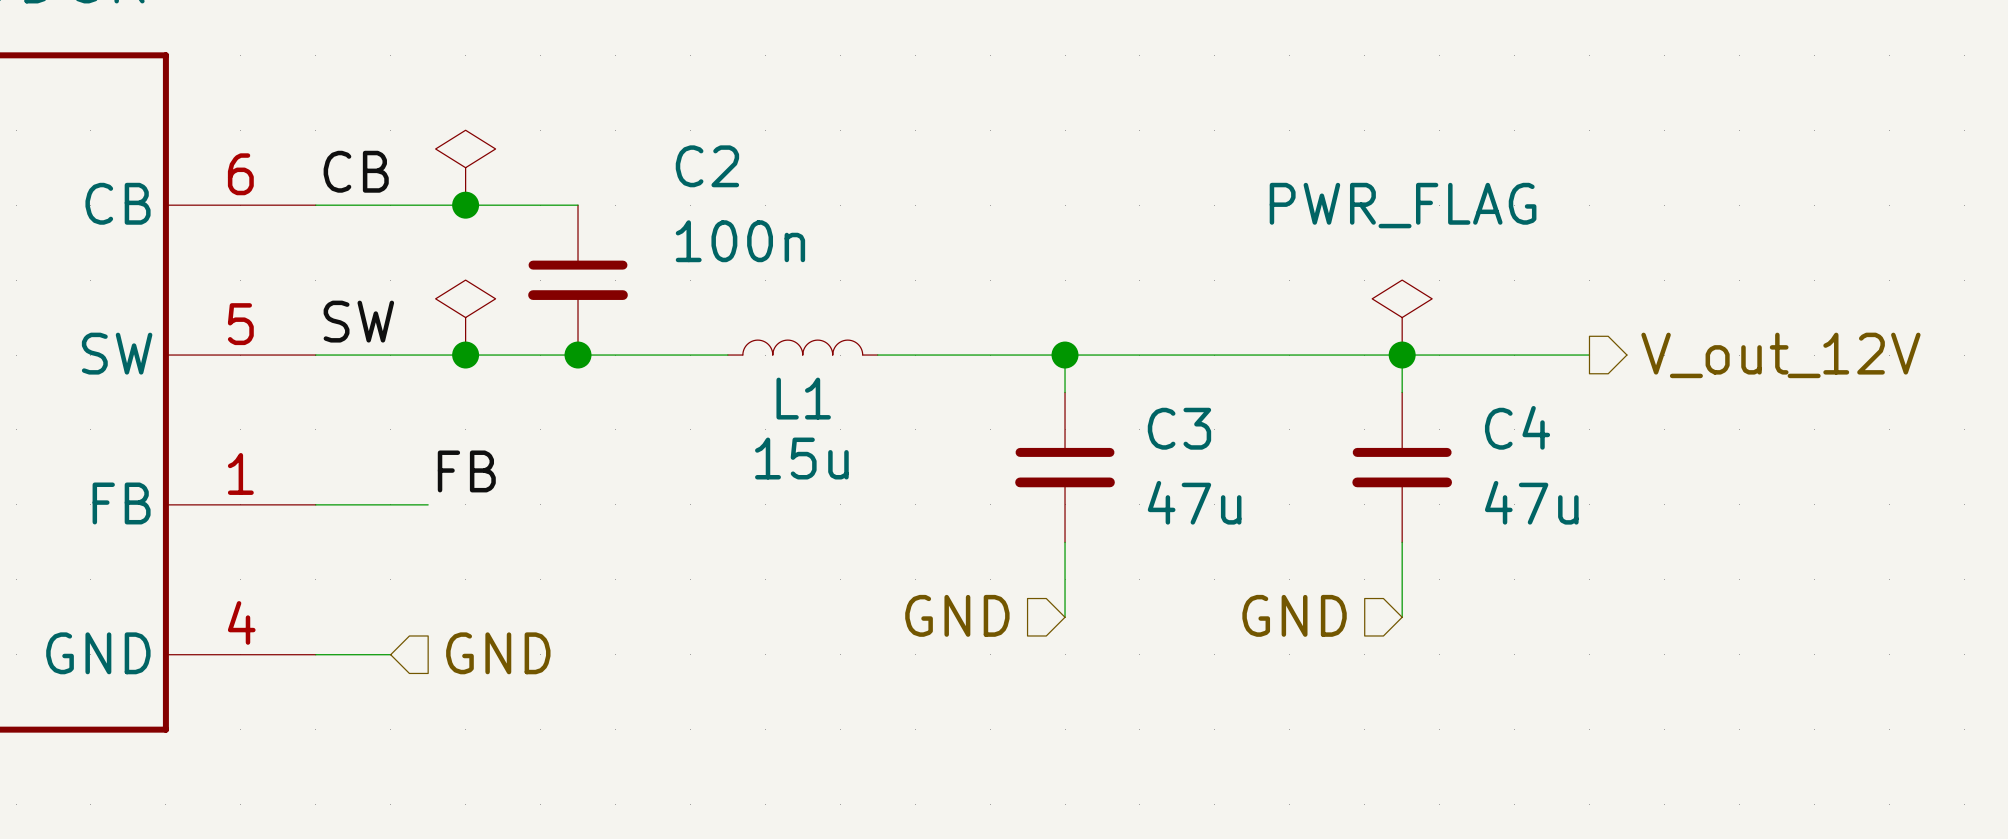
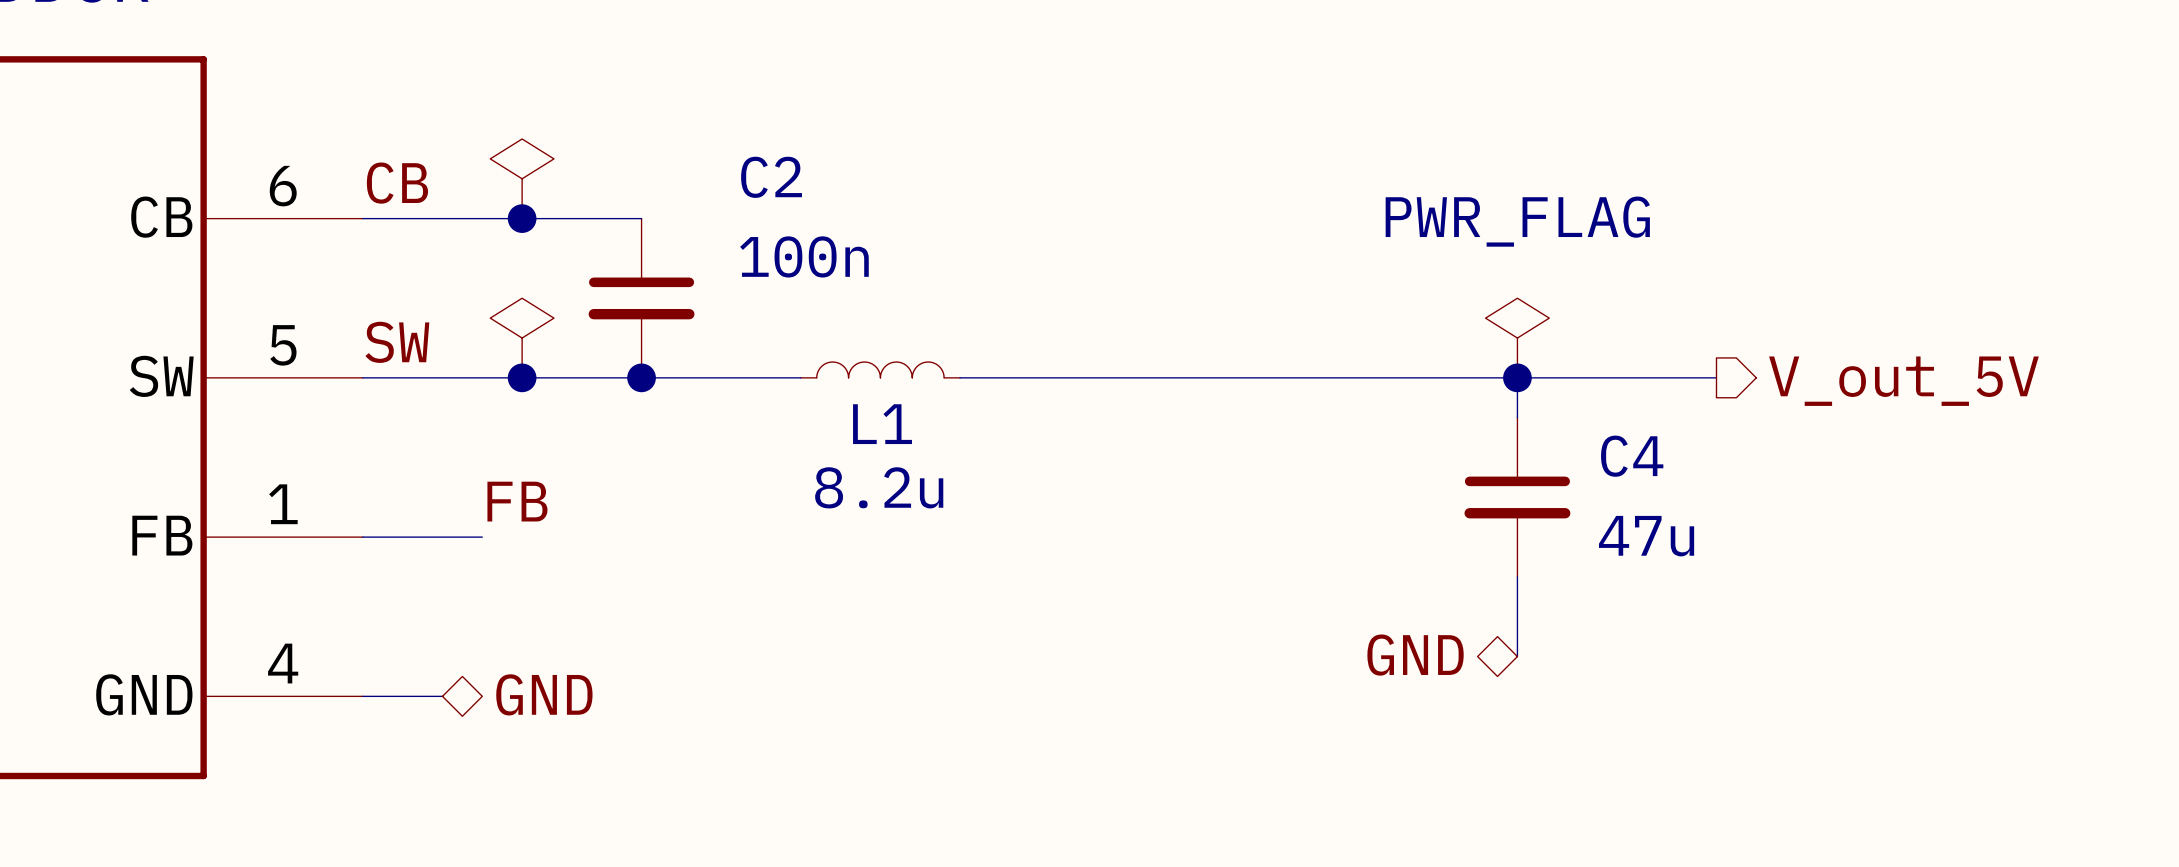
wire: (1065, 355) (1065, 392) -> none
junction: (1065, 355) -> none
hierarchical label: V_out_12V (1780, 355) -> V_out_5V (1903, 381)
L1 value: 15u (801, 458) -> 8.2u (879, 487)
C3: 47u (1065, 467) -> none
wire: (1065, 542) (1065, 617) -> none
hierarchical label: GND (957, 615) -> none
hierarchical label shape: input (1294, 615) -> bidirectional (1415, 655)
hierarchical label shape: input (498, 653) -> bidirectional (544, 694)

